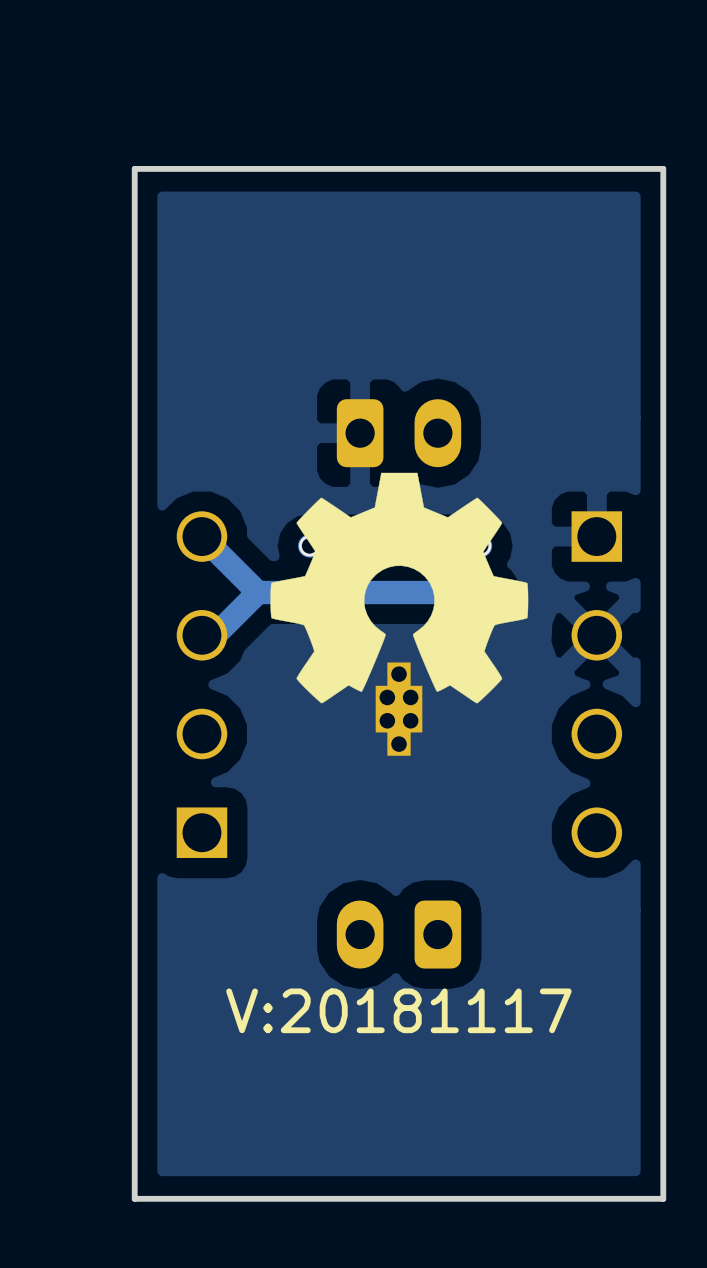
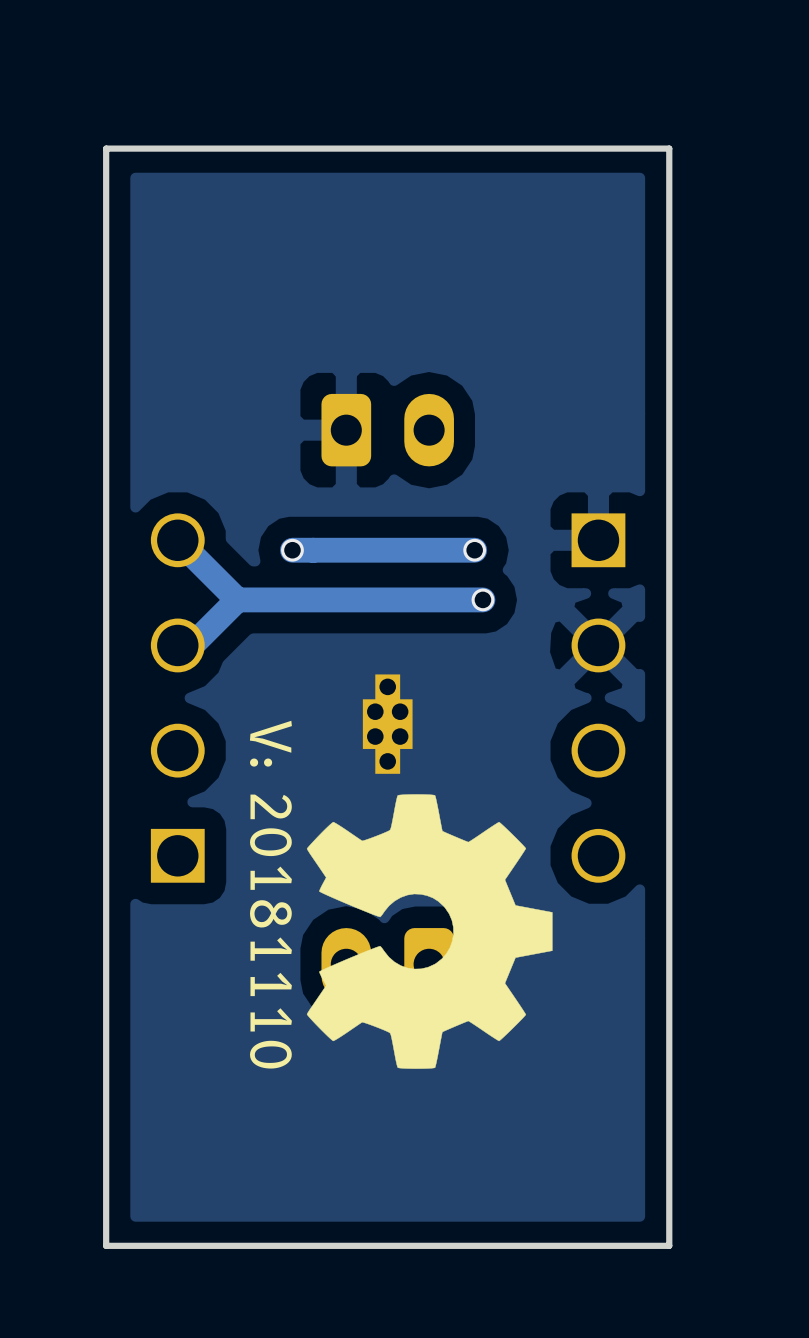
drawing: [270, 472, 529, 704] -> none
drawing: none -> [306, 794, 553, 1069]
drawing: [226, 988, 572, 1034] -> none

